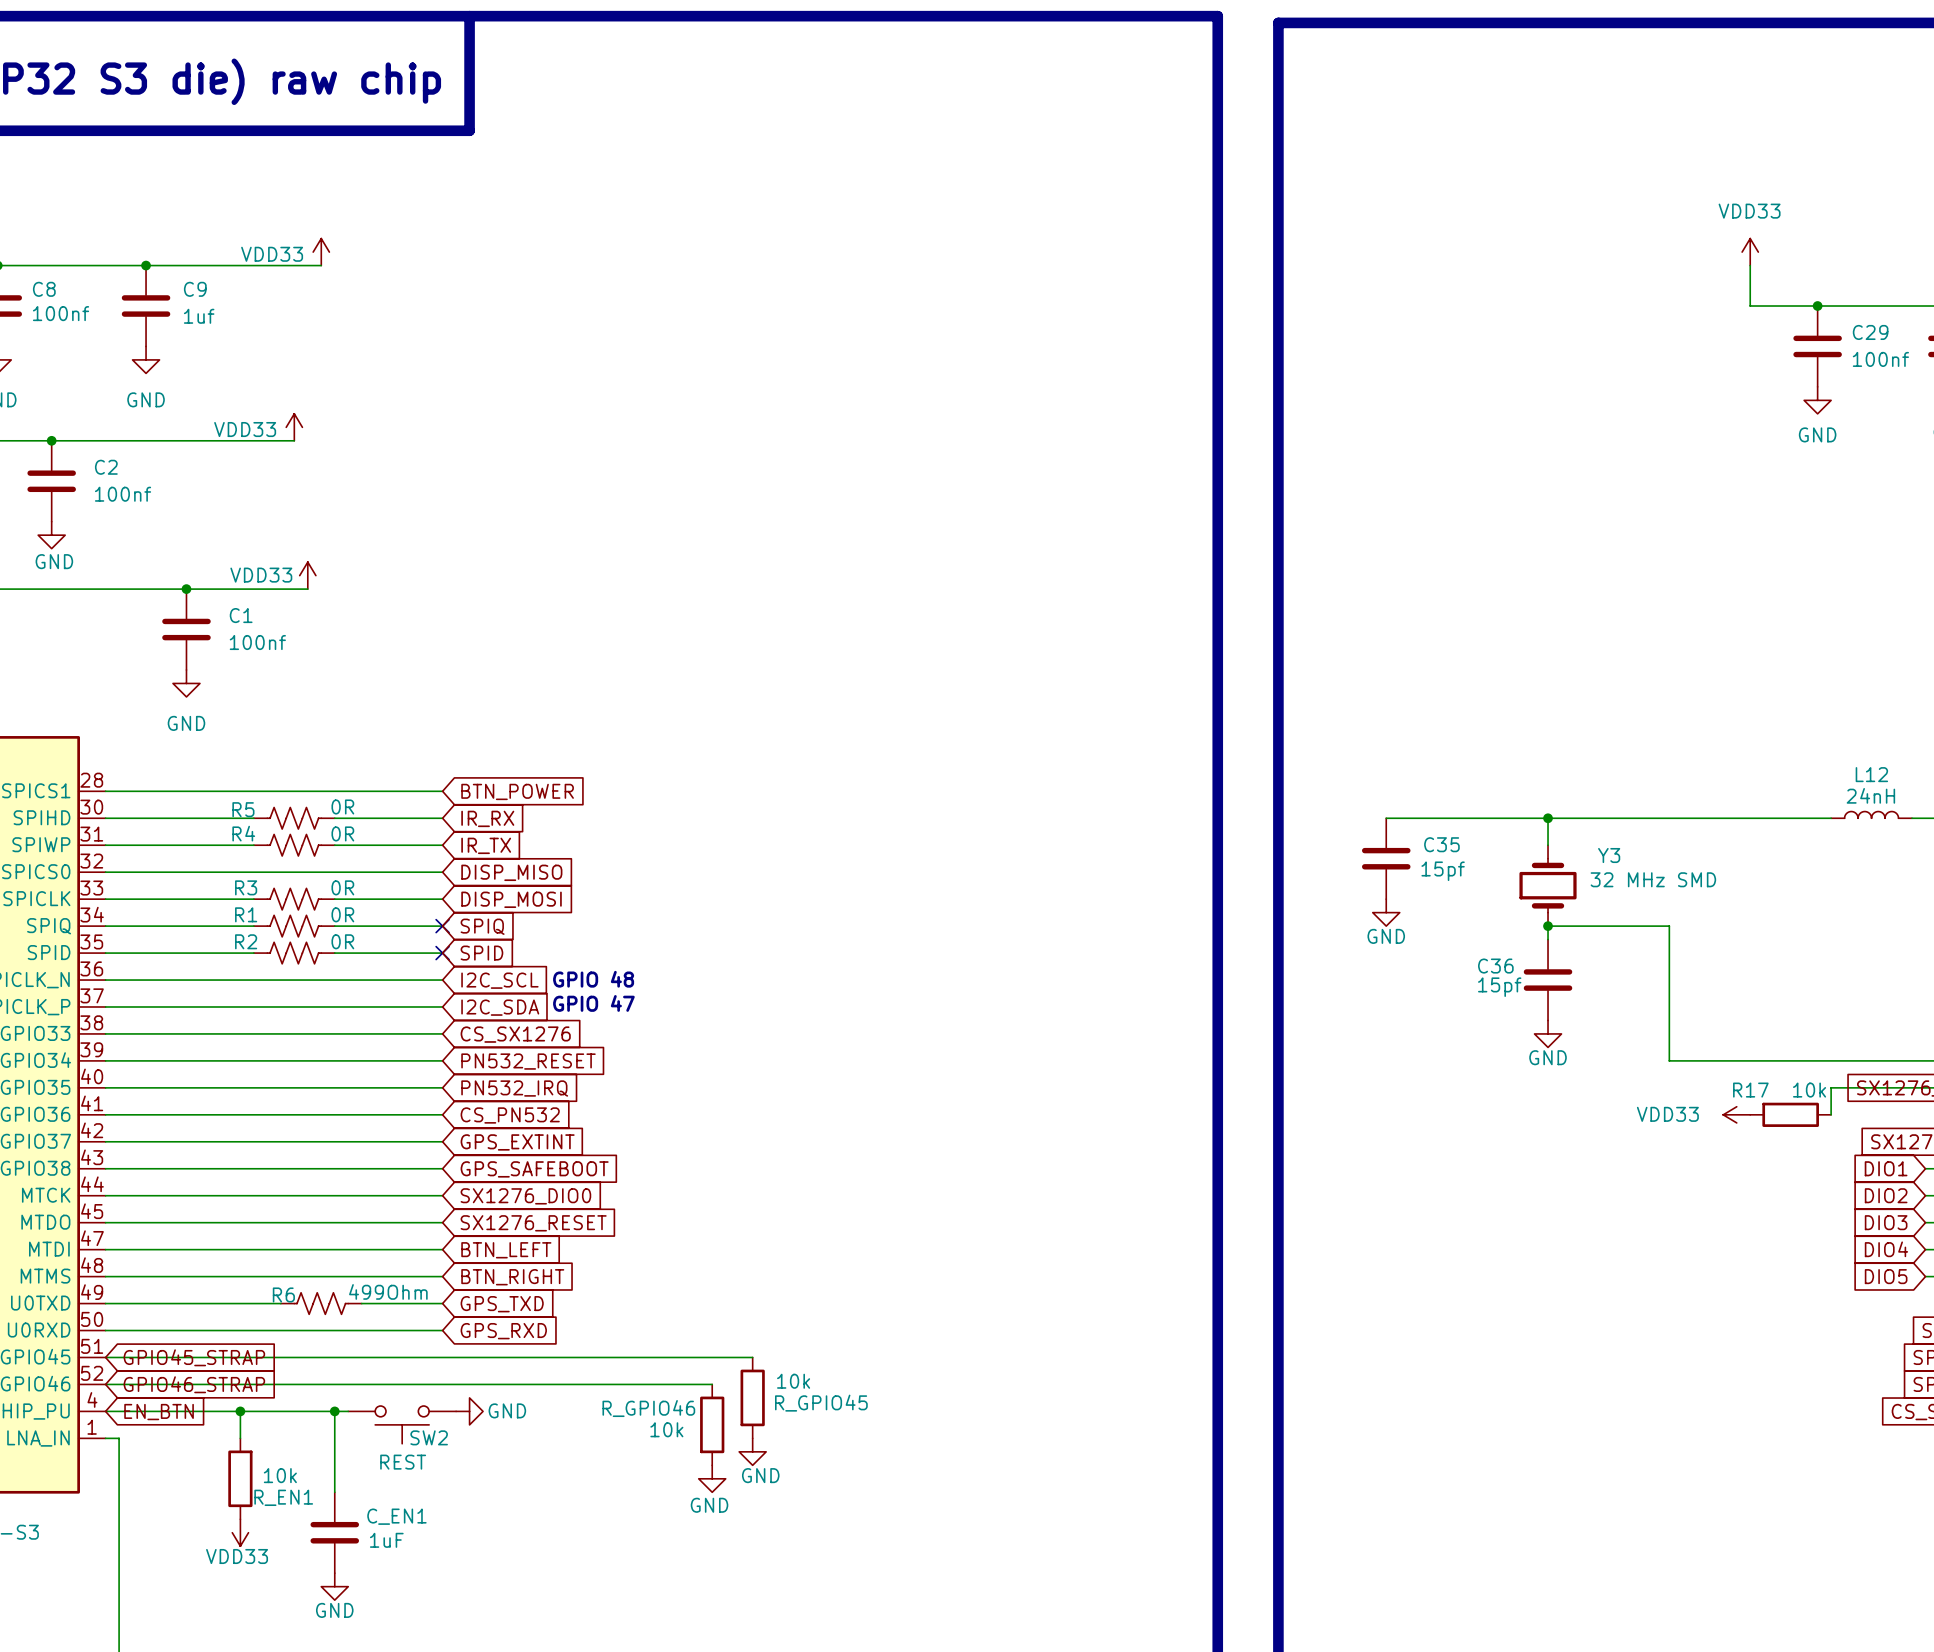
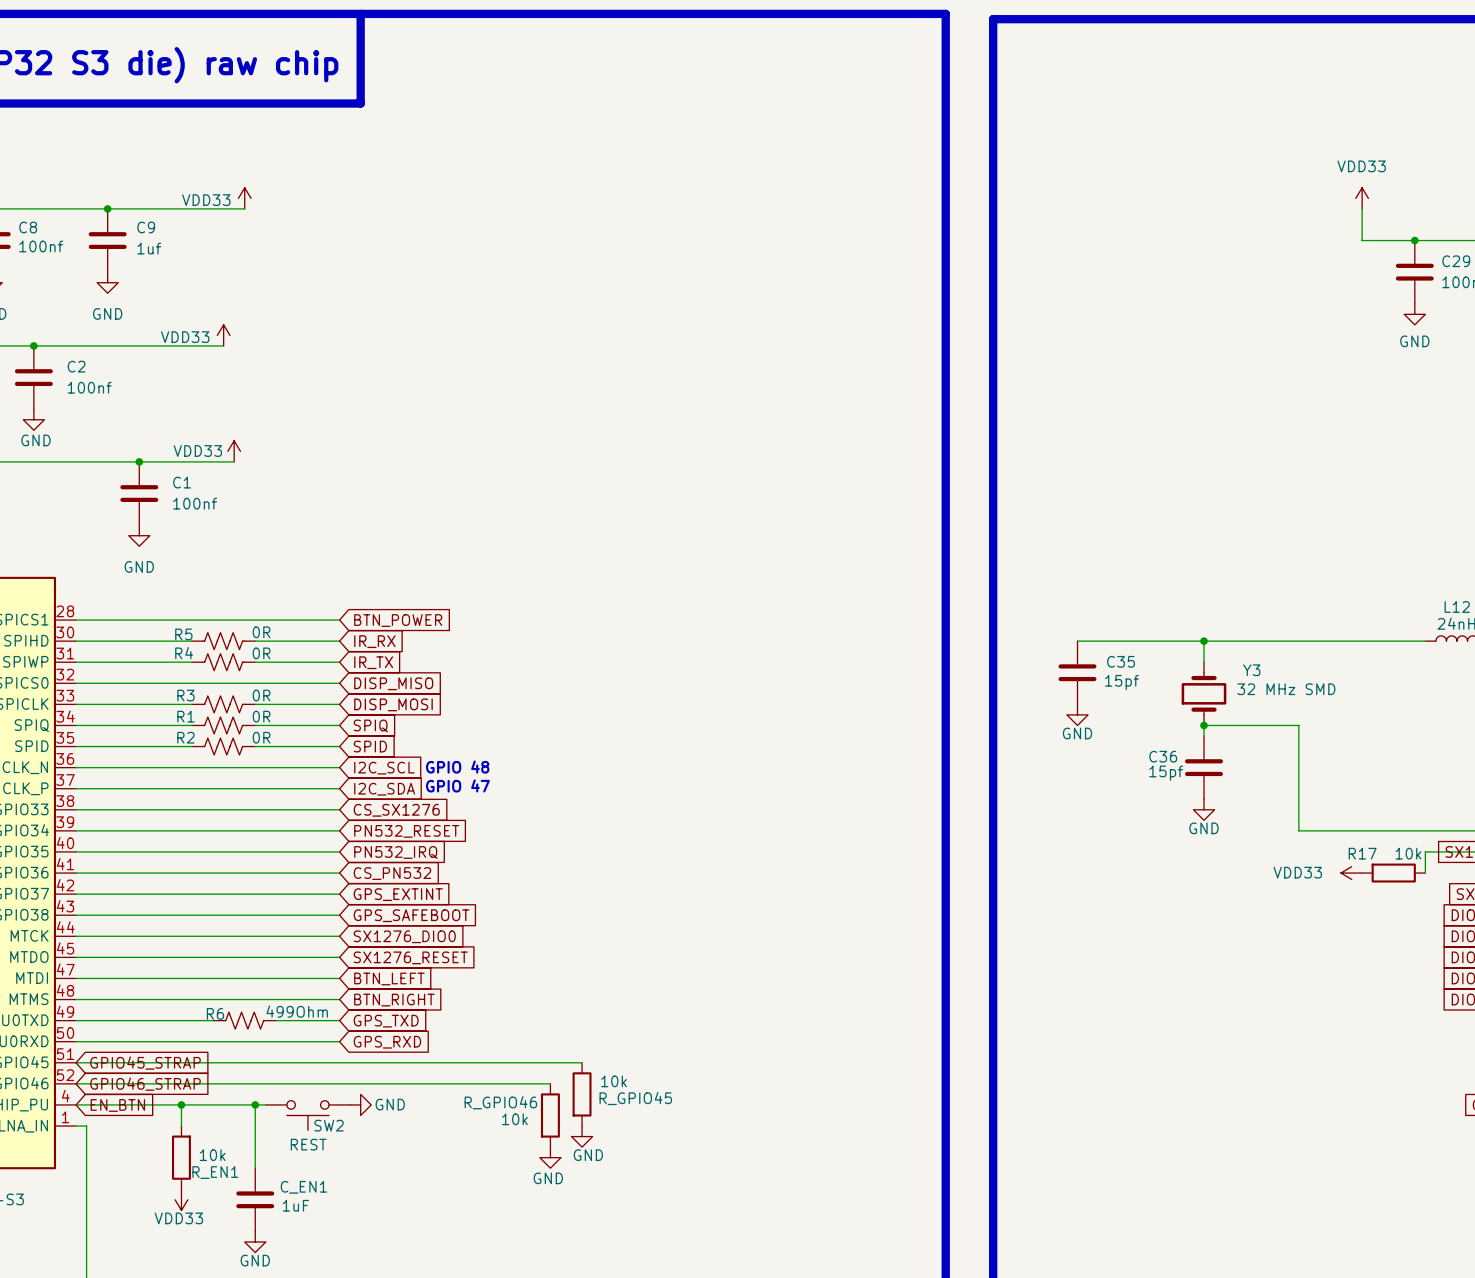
no-connect mark: (442, 926) -> none
no-connect mark: (442, 953) -> none

